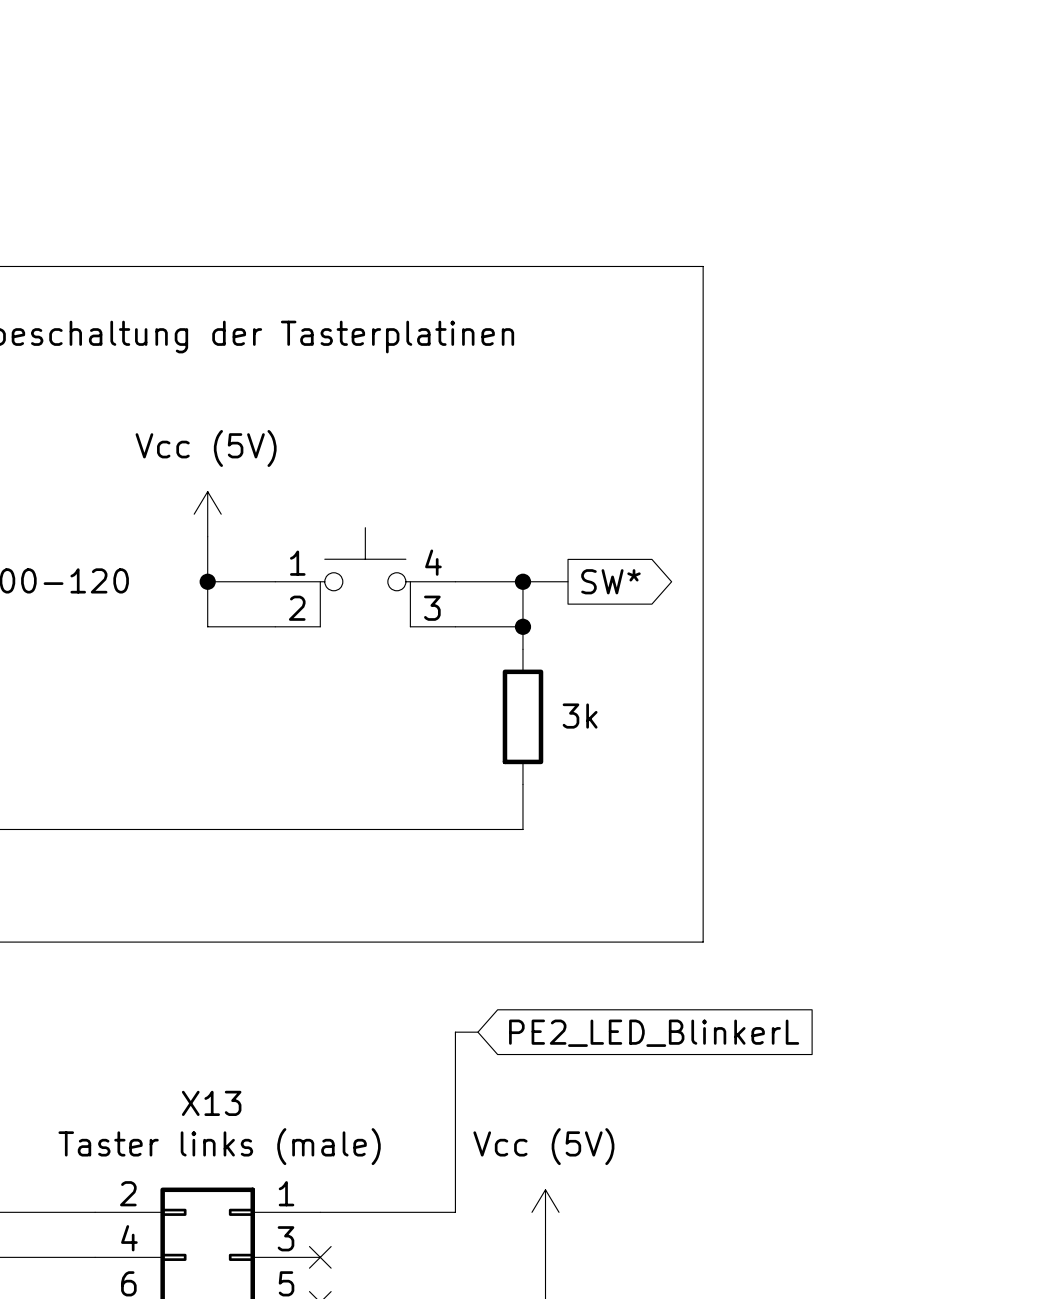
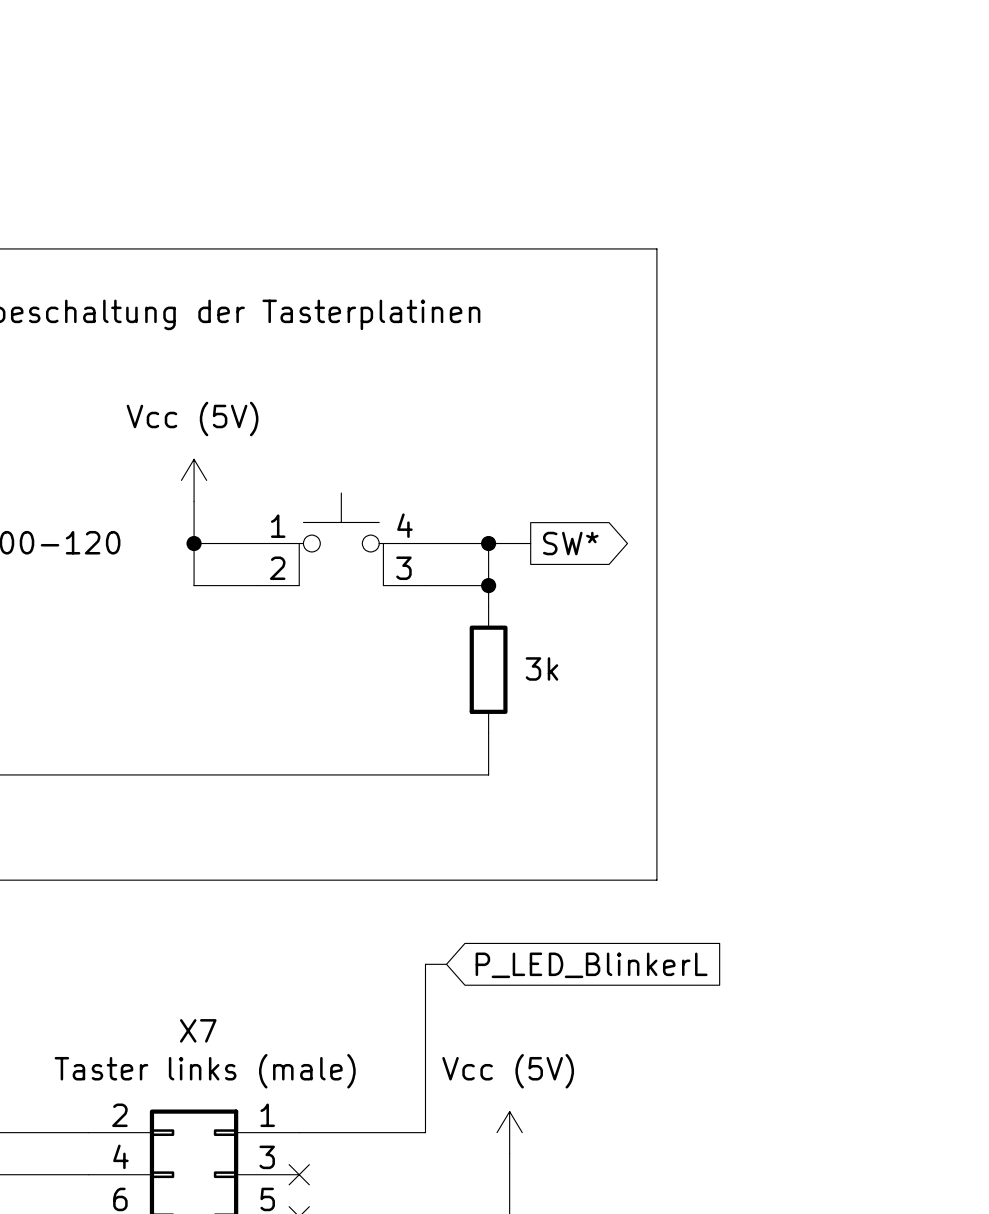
global label: PE2_LED_BlinkerL (654, 1033) -> P_LED_BlinkerL (591, 965)
X13 name: X13 (211, 1103) -> X7 (198, 1030)

